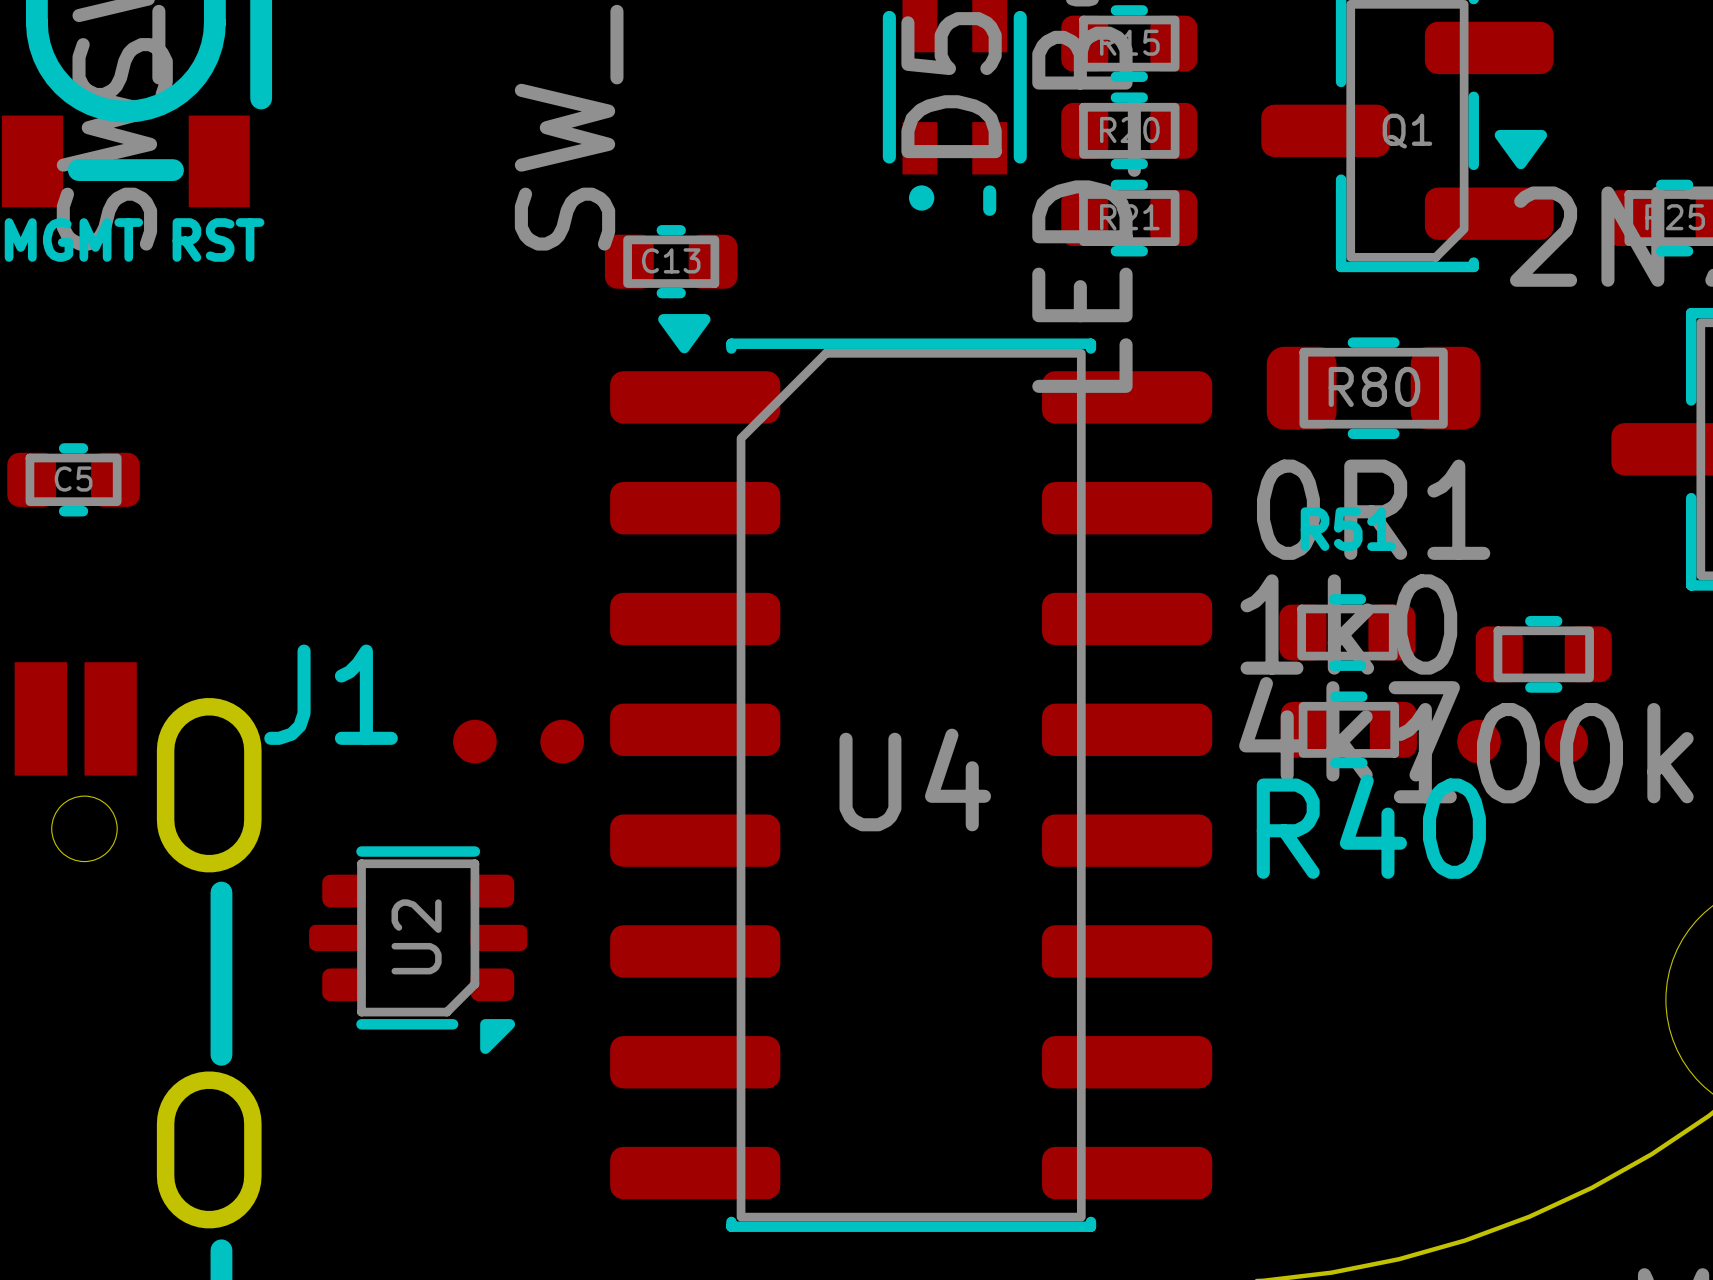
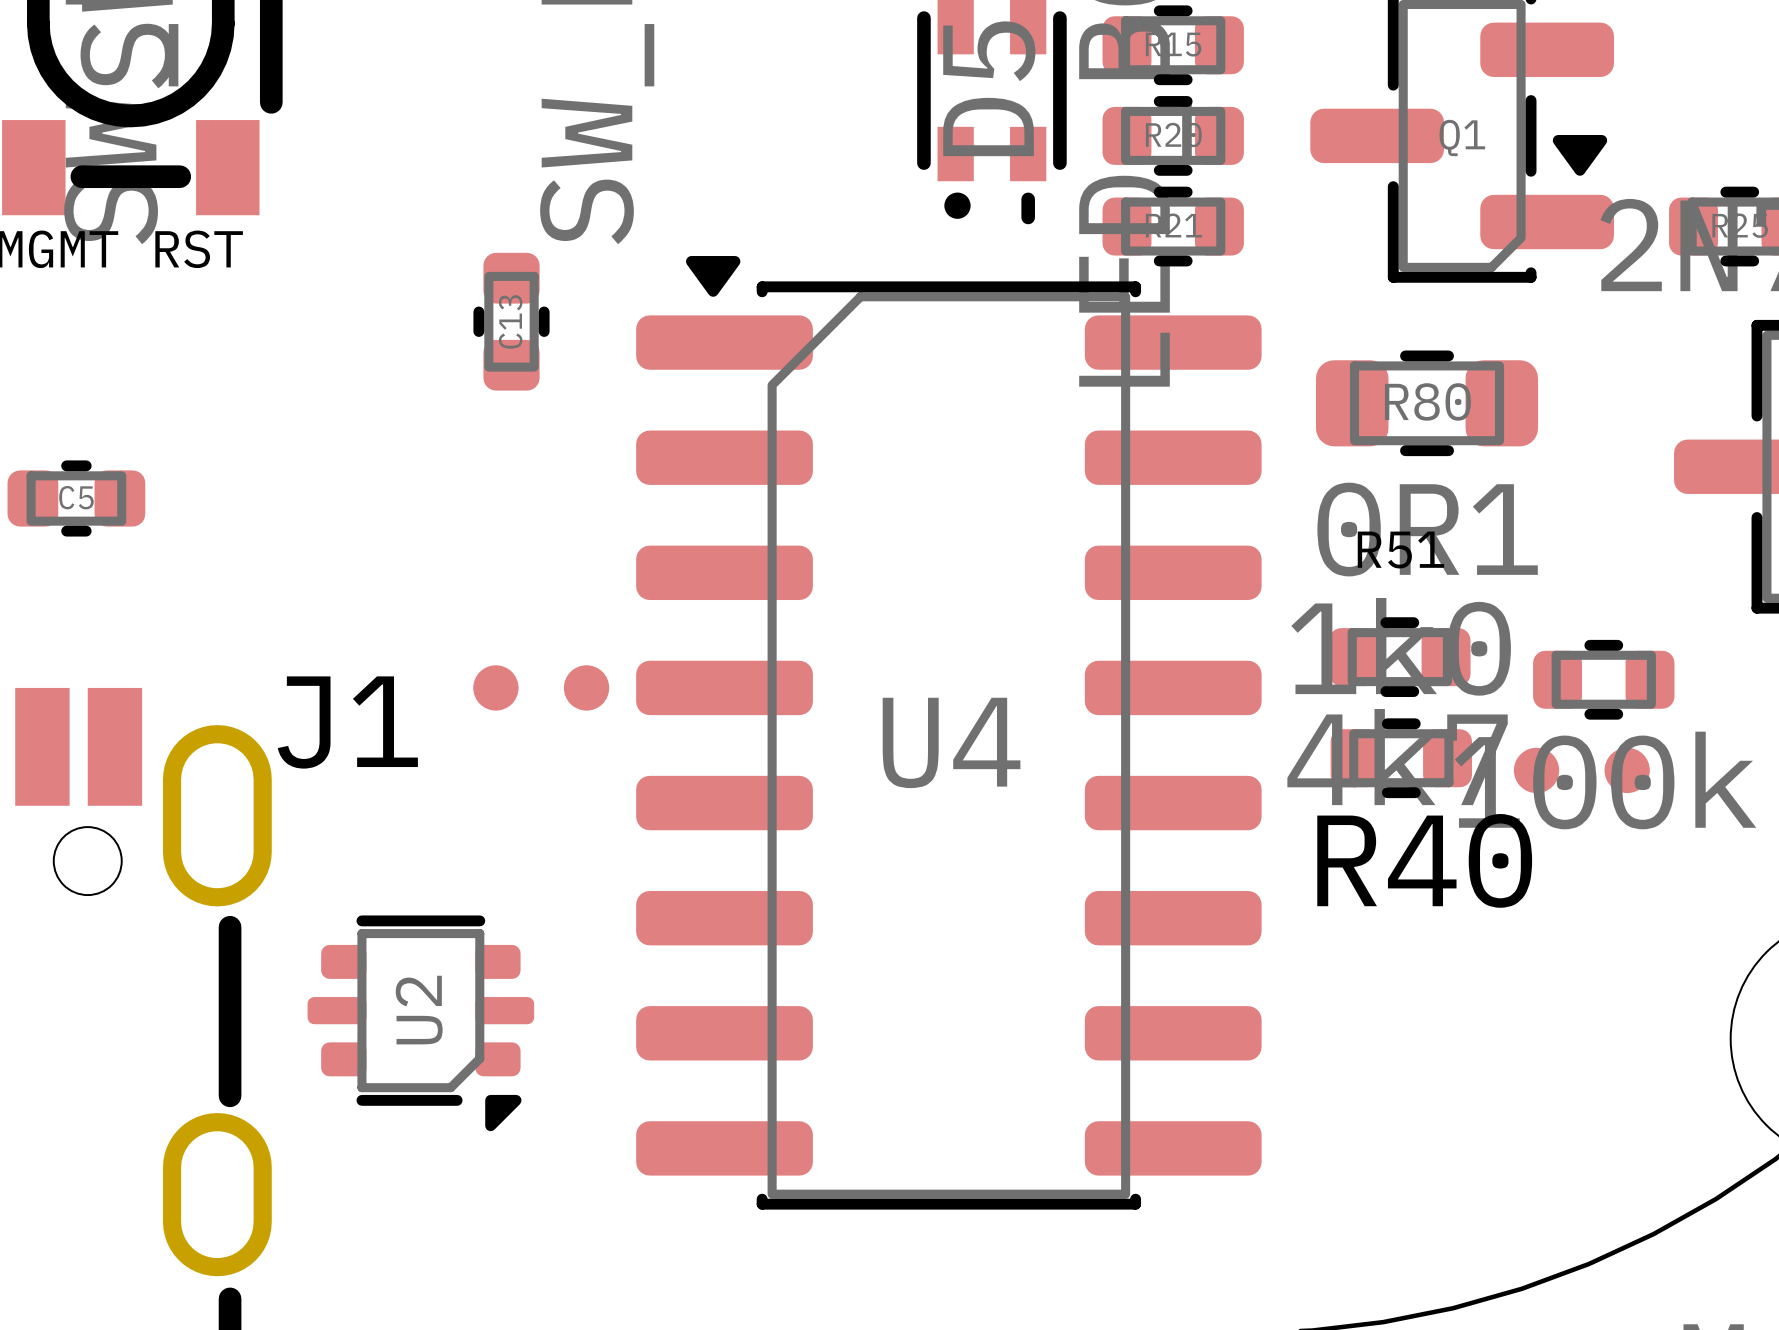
C13 rotation: 0° (671, 261) -> 90° clockwise (511, 321)
C13 position: (671, 261) -> (511, 321)
part position: (518, 741) -> (541, 687)
U4 position: (911, 773) -> (948, 732)
U2 position: (418, 950) -> (420, 1023)

